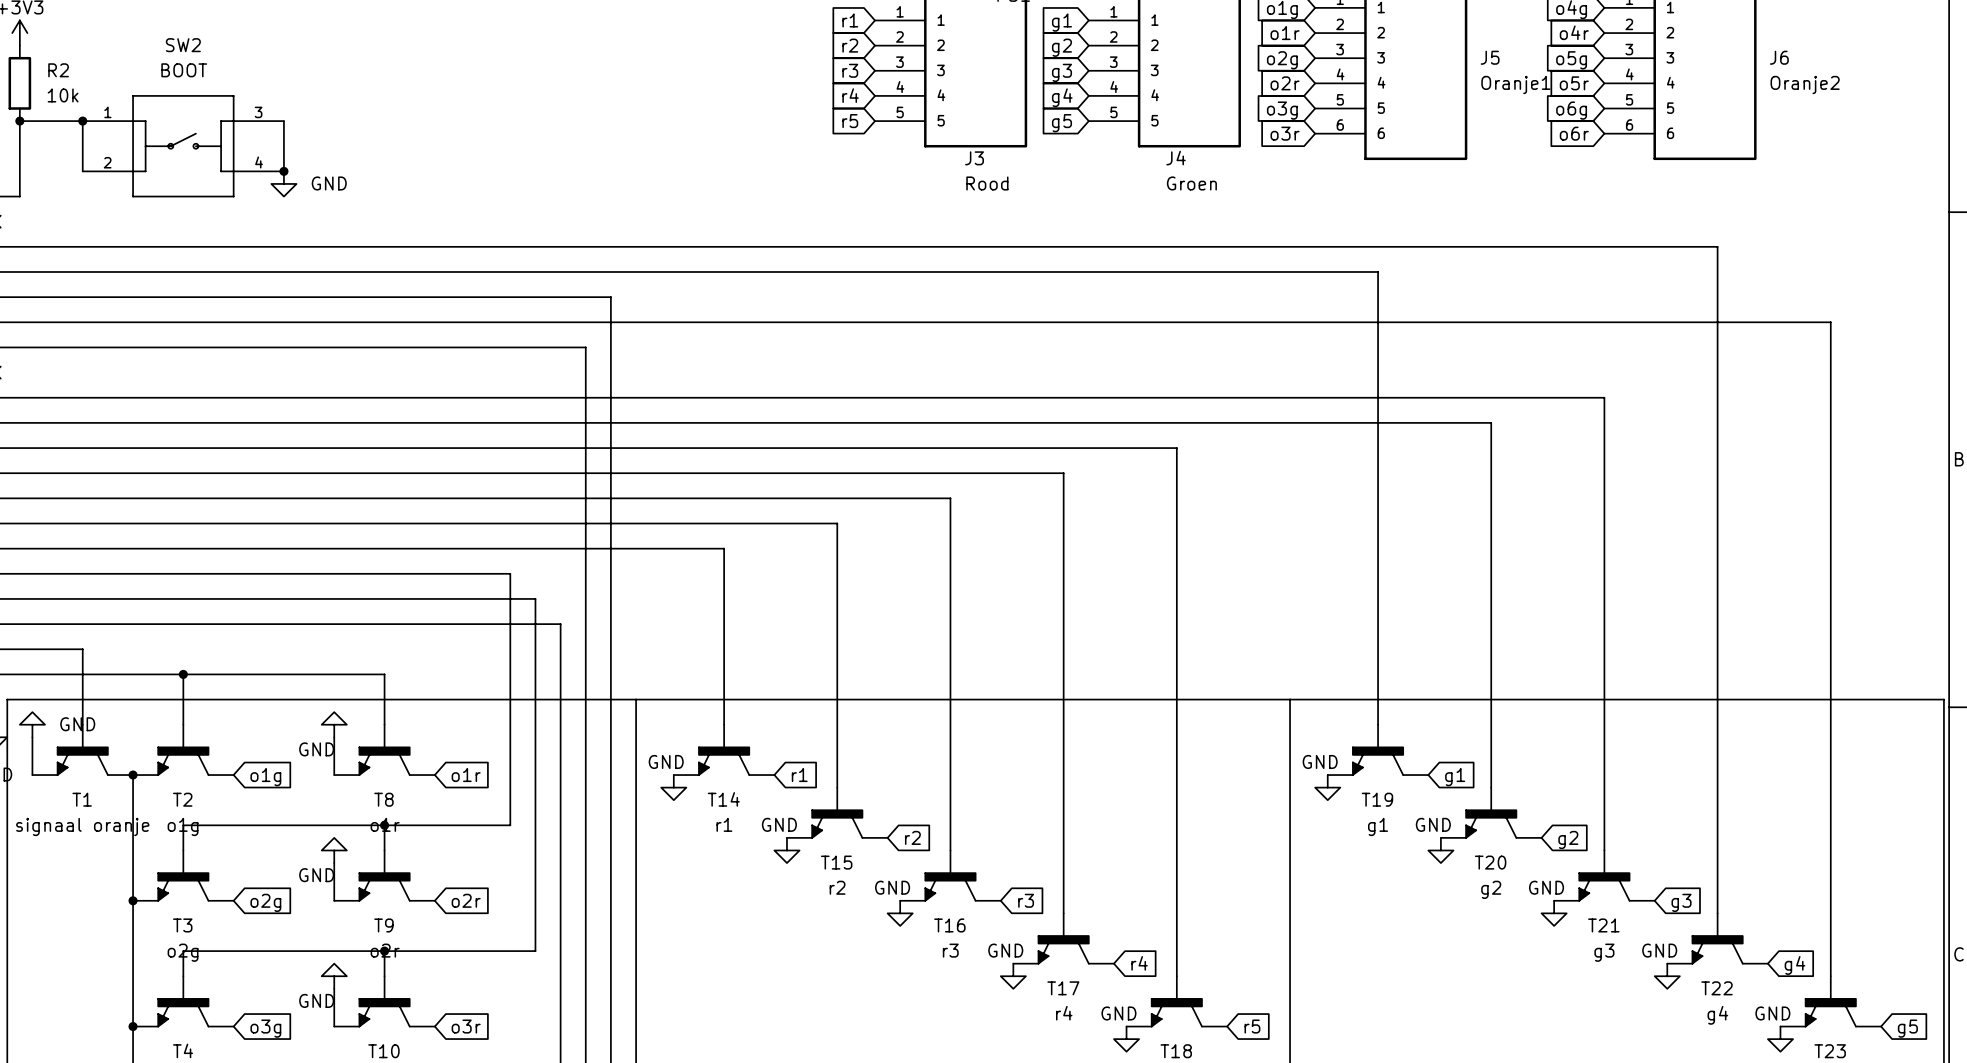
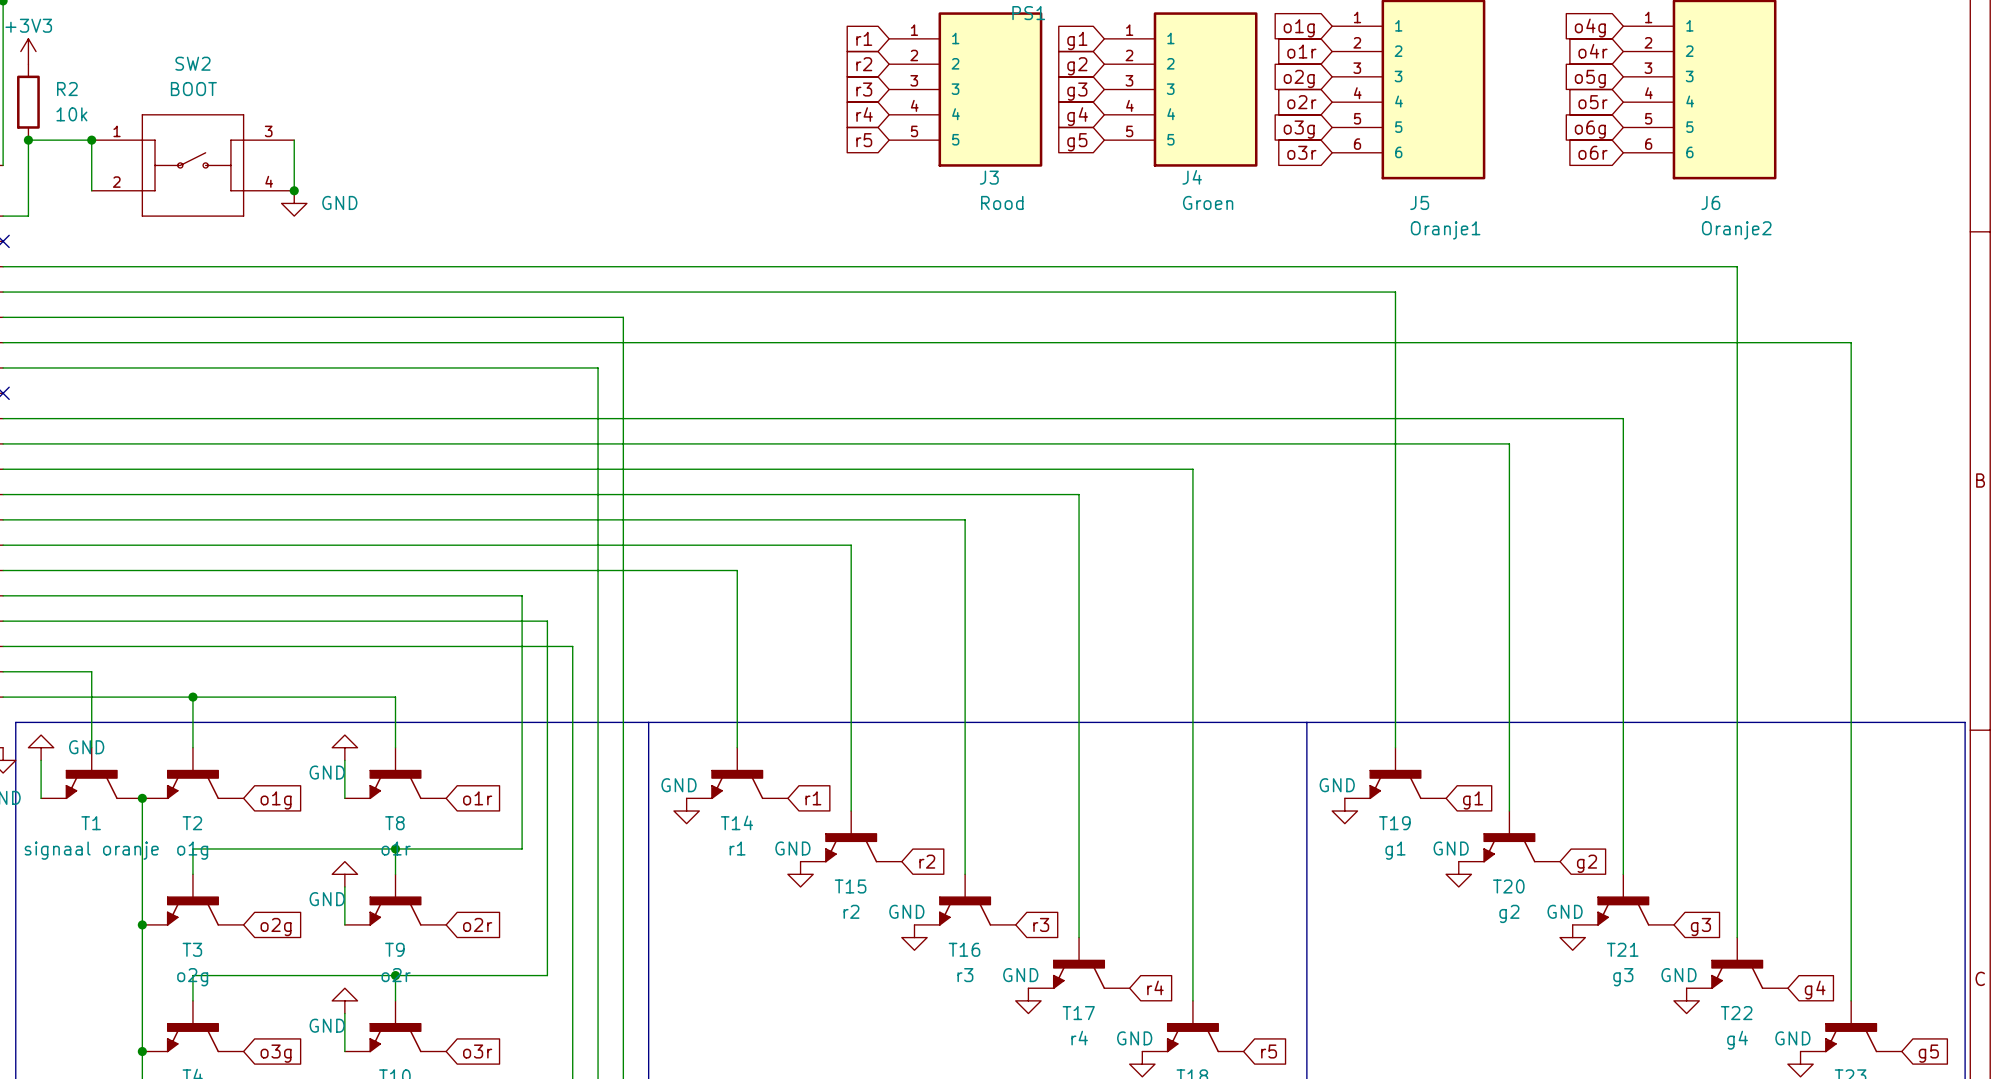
J5 name position: J5 (1490, 57) -> J5 (1419, 202)
J6 name position: J6 (1779, 57) -> J6 (1710, 202)
J5 value position: Oranje1 (1515, 84) -> Oranje1 (1445, 230)
J6 value position: Oranje2 (1805, 84) -> Oranje2 (1736, 230)

